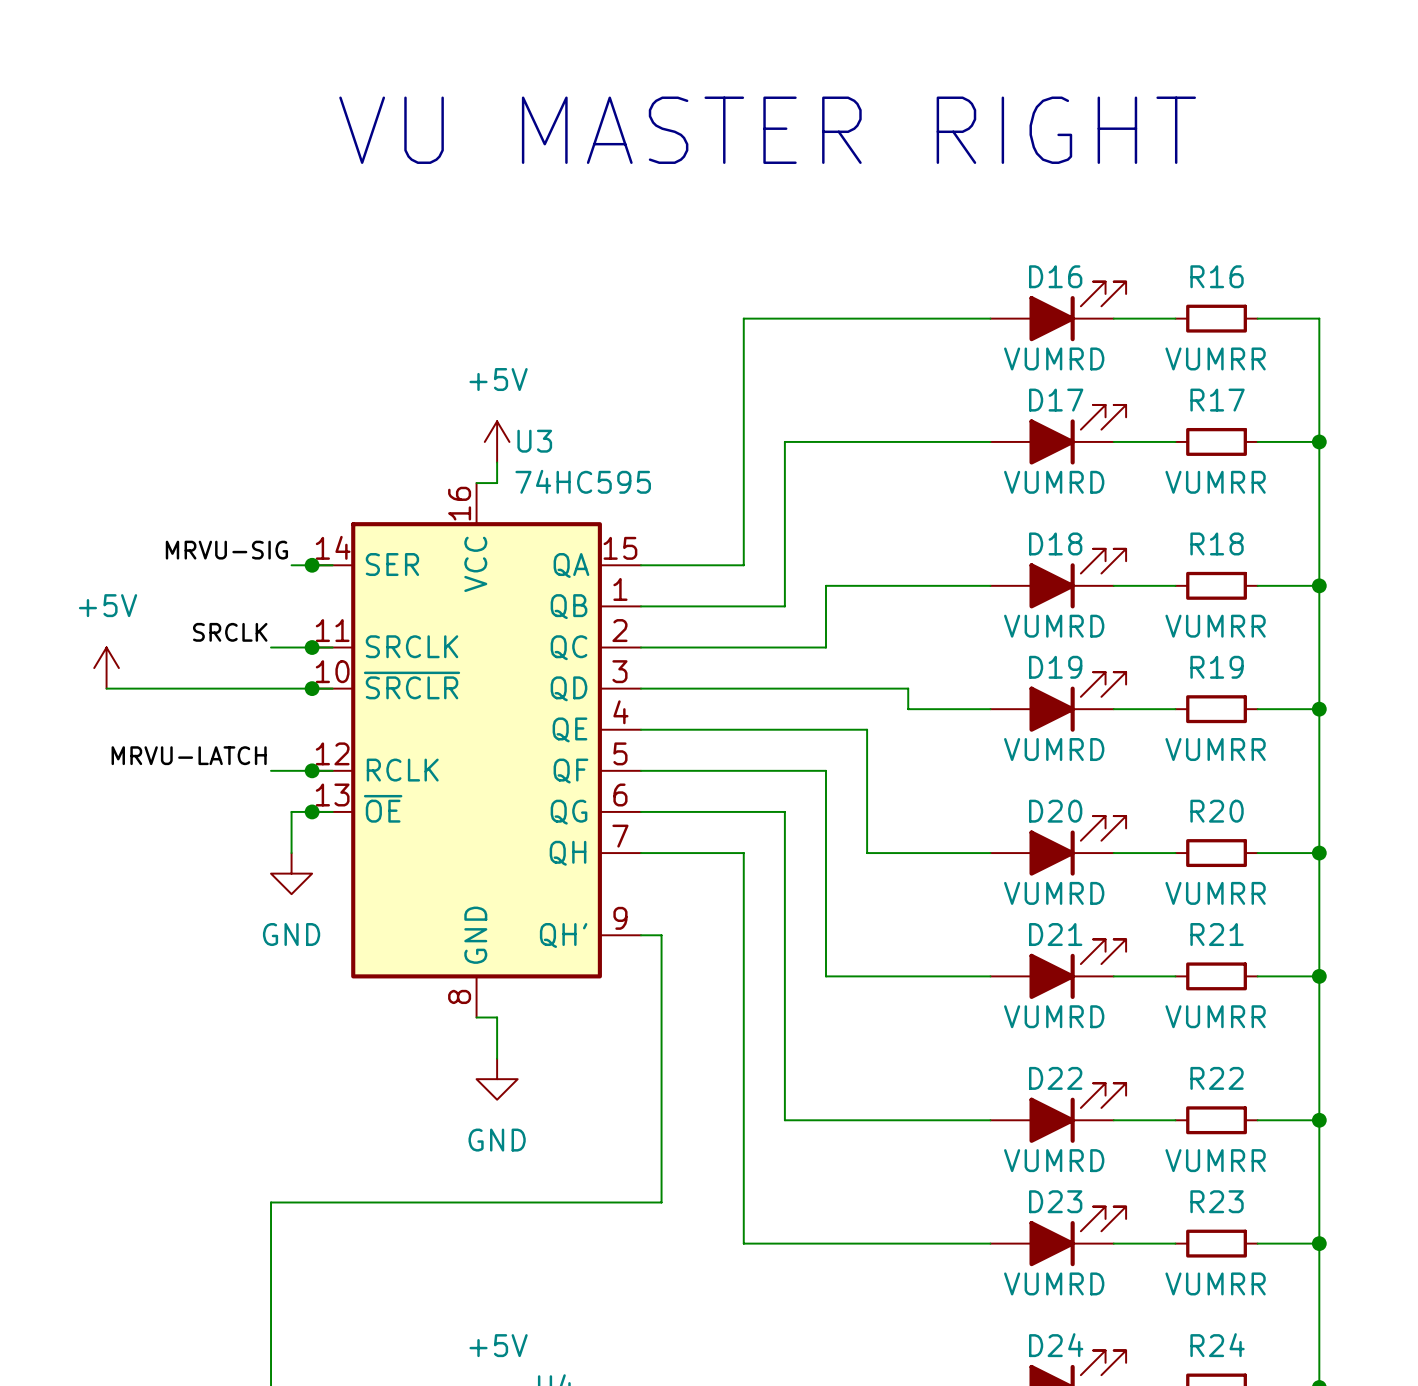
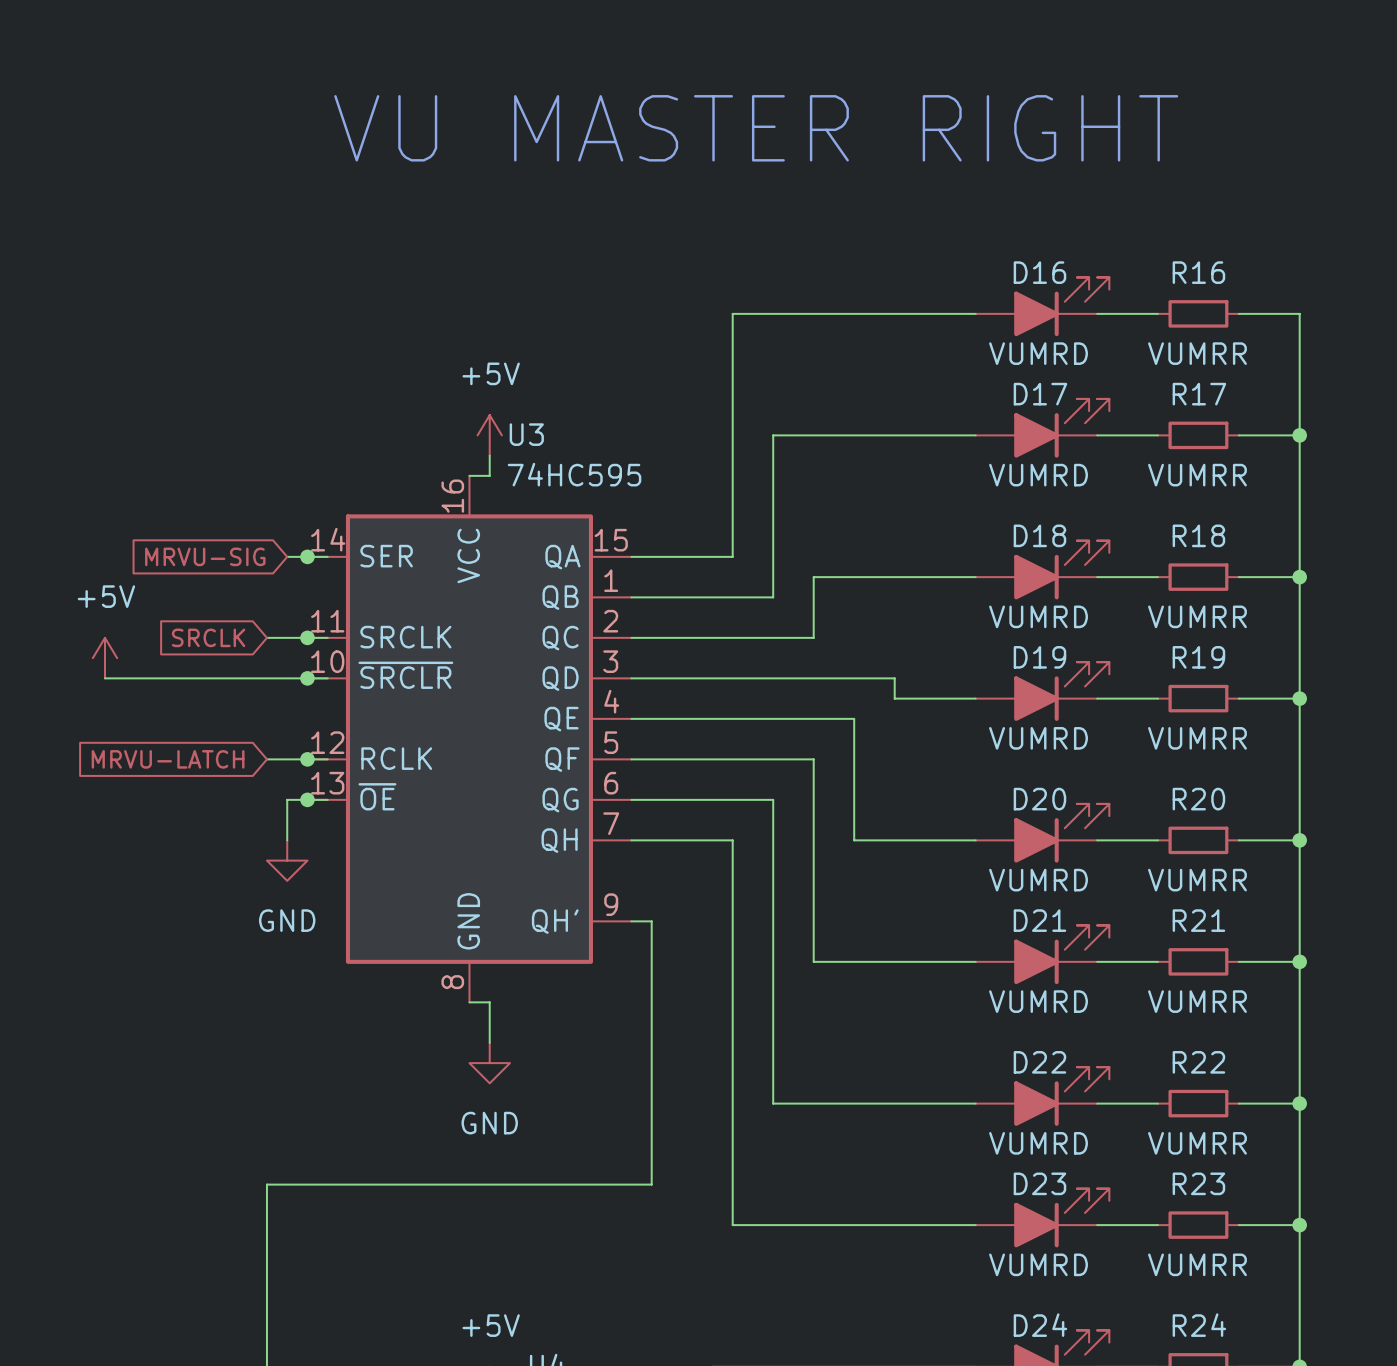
label: MRVU-SIG (226, 550) -> none
global label: none -> MRVU-SIG (205, 556)
label: SRCLK (230, 632) -> none
global label: none -> SRCLK (208, 637)
label: MRVU-LATCH (189, 755) -> none
global label: none -> MRVU-LATCH (168, 759)

